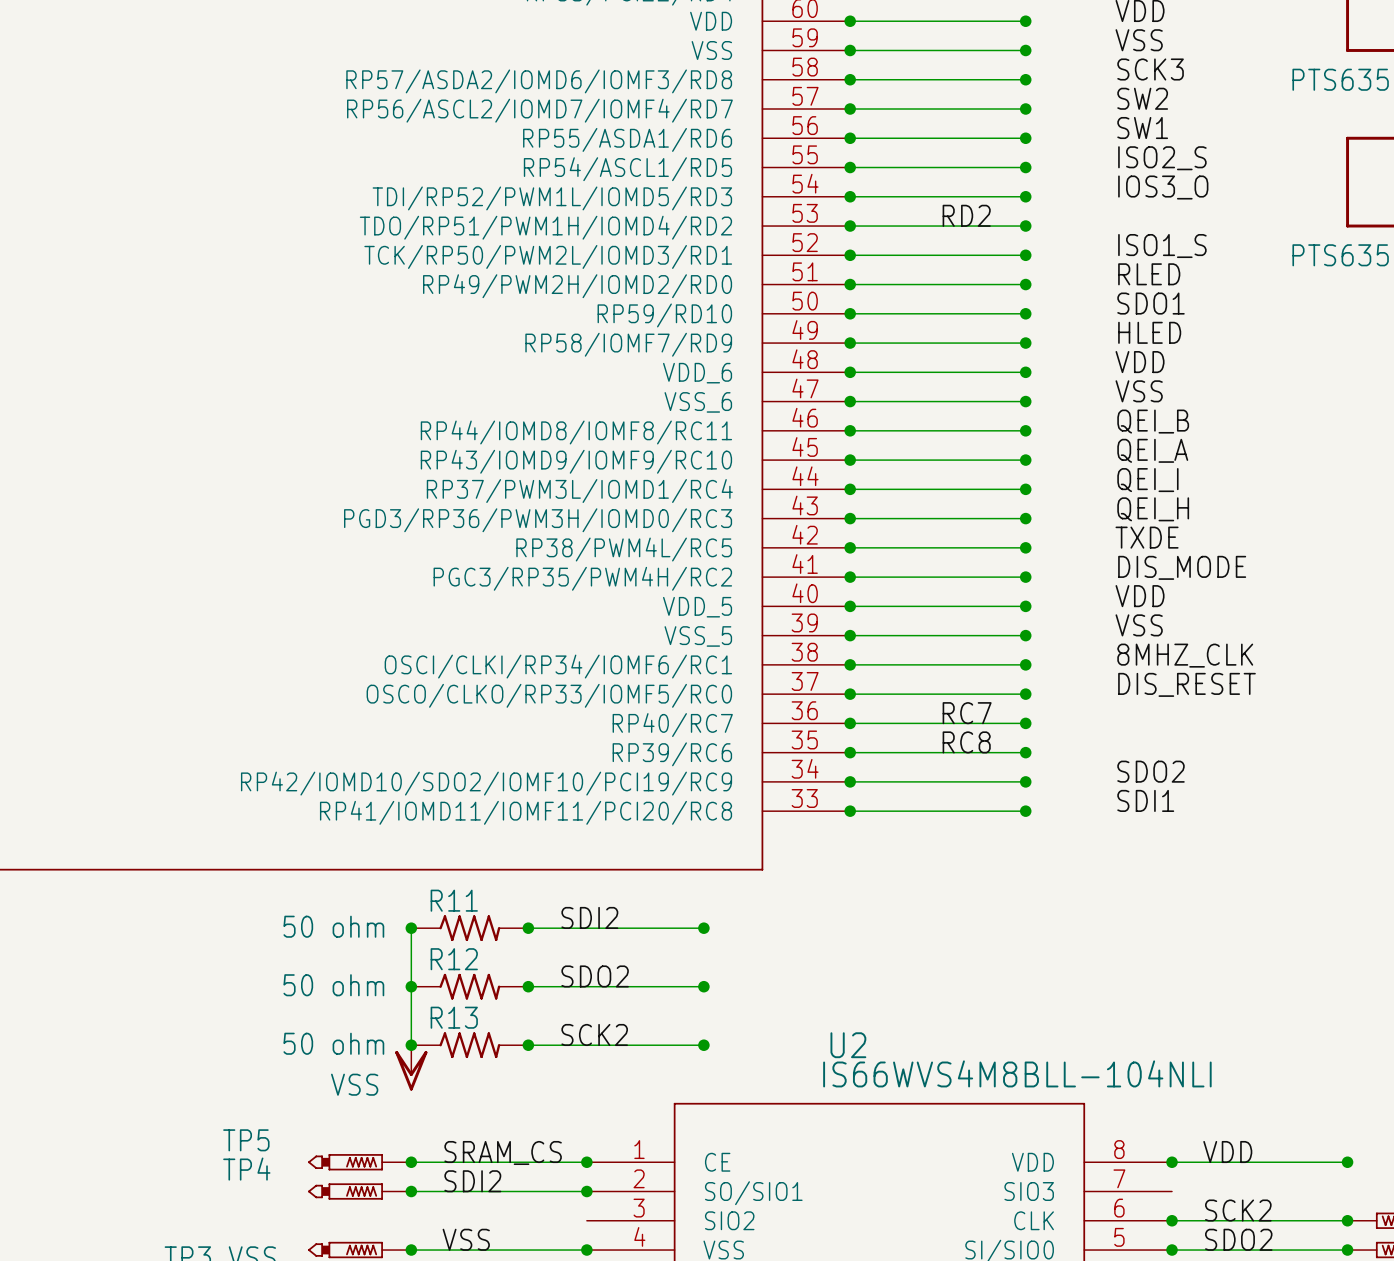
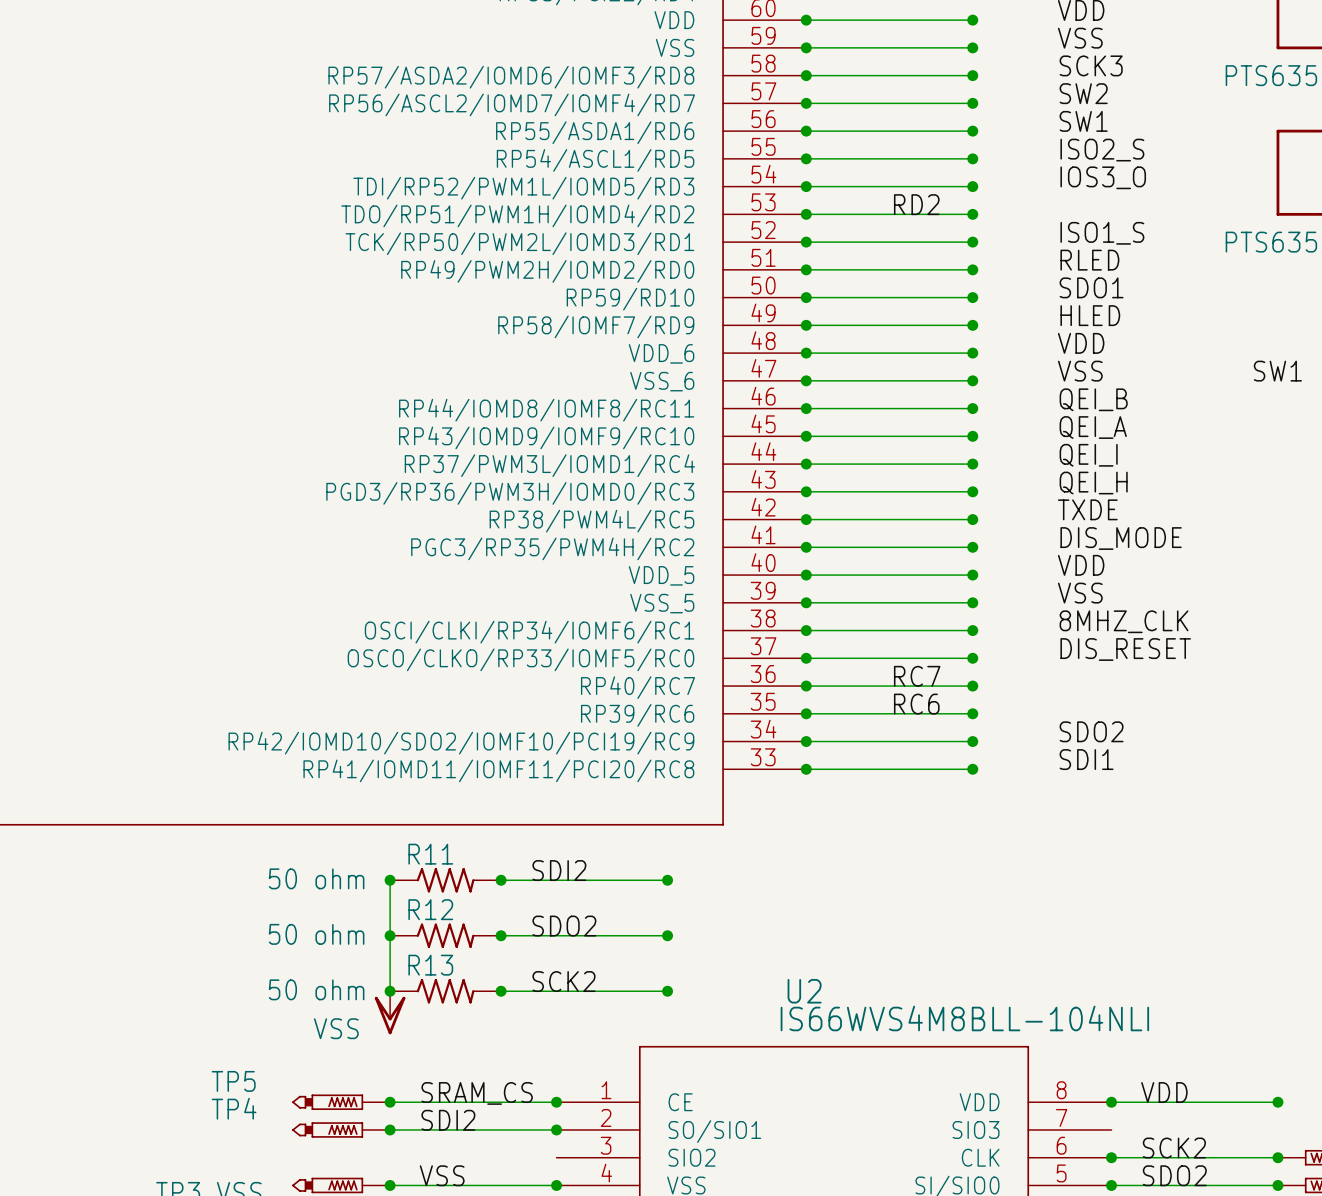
label: none -> SW1 (1277, 371)
label: RC8 (966, 742) -> RC6 (916, 704)

